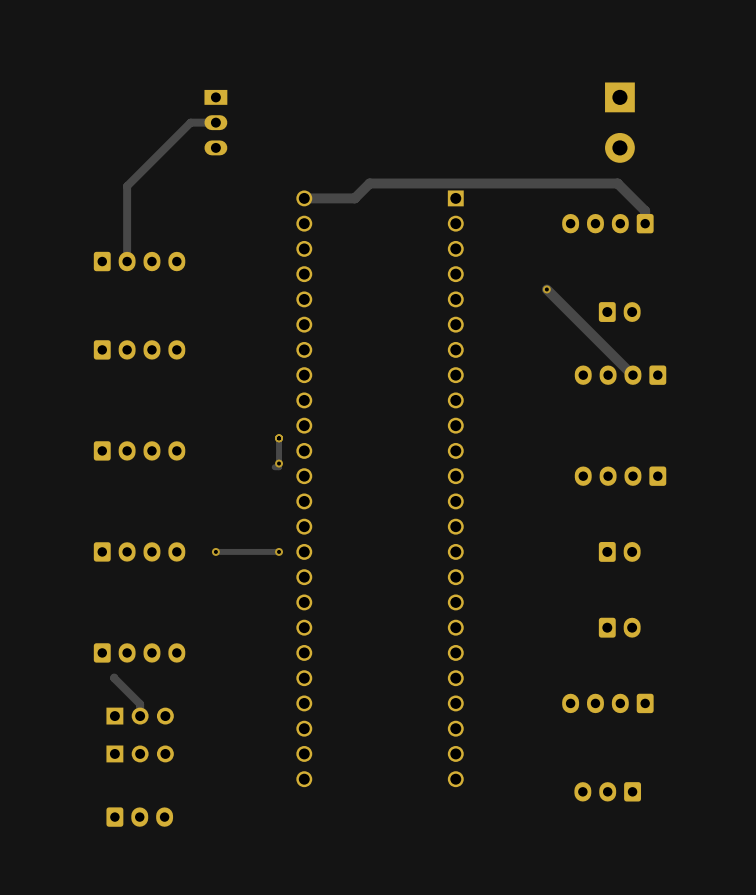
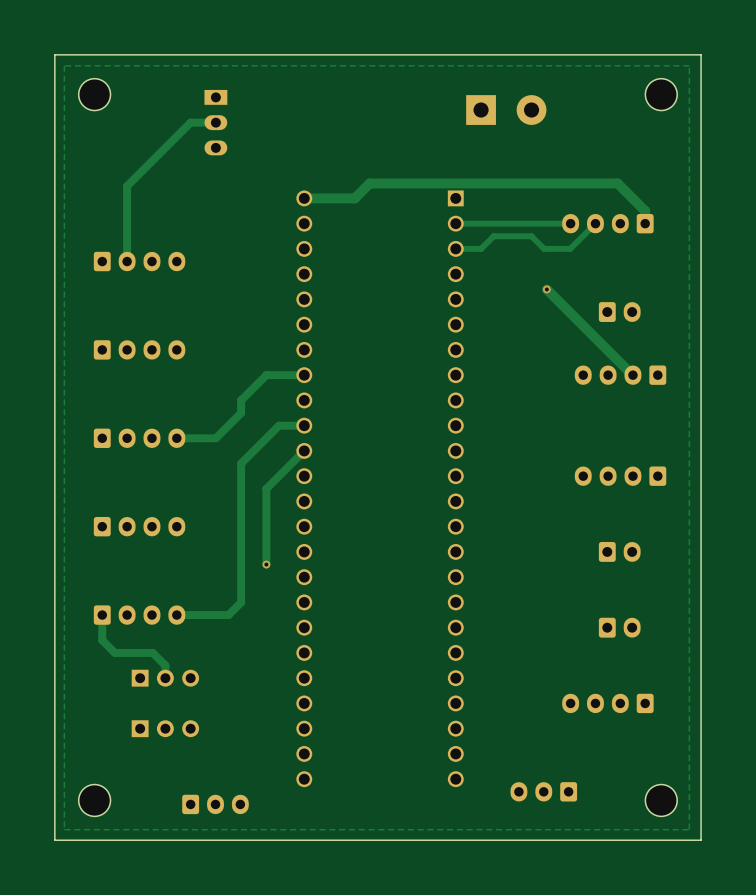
board edge: none -> (701, 54) (54, 54) (54, 840) (701, 840) (701, 54)
zone outline: none -> (689, 65) (689, 829) (64, 829) (64, 65) (689, 65)
part: none -> (94, 94)
part: none -> (661, 94)
part rotation: 0° (619, 122) -> 90° counterclockwise (506, 110)
part position: (619, 122) -> (506, 110)
track: none -> (570, 223) (455, 223)
track: none -> (595, 223) (570, 248) (544, 248) (531, 236) (493, 236) (481, 248) (455, 248)
track: none -> (304, 375) (266, 375) (241, 400) (241, 413) (215, 438) (176, 438)
track: none -> (304, 425) (279, 425) (241, 463) (241, 602) (228, 615) (176, 615)
track: (279, 438) (279, 467) (274, 467) -> none
via: (279, 438) -> none
part position: (139, 450) -> (139, 438)
track: none -> (304, 450) (266, 488) (266, 564)
via: (279, 463) -> none
part position: (139, 551) -> (139, 526)
via: (215, 551) -> none
track: (279, 551) (215, 551) -> none
via position: (279, 551) -> (266, 564)
track: none -> (102, 615) (102, 640) (114, 652) (152, 652) (165, 665) (165, 678)
part: none -> (139, 615)
part: (139, 652) -> none
track: (114, 677) (140, 704) (140, 716) -> none
part: none -> (165, 678)
part: (140, 716) -> none
part: none -> (165, 728)
part: (140, 753) -> none
part position: (607, 791) -> (543, 791)
part: none -> (94, 800)
part: none -> (661, 800)
part position: (139, 817) -> (215, 804)

